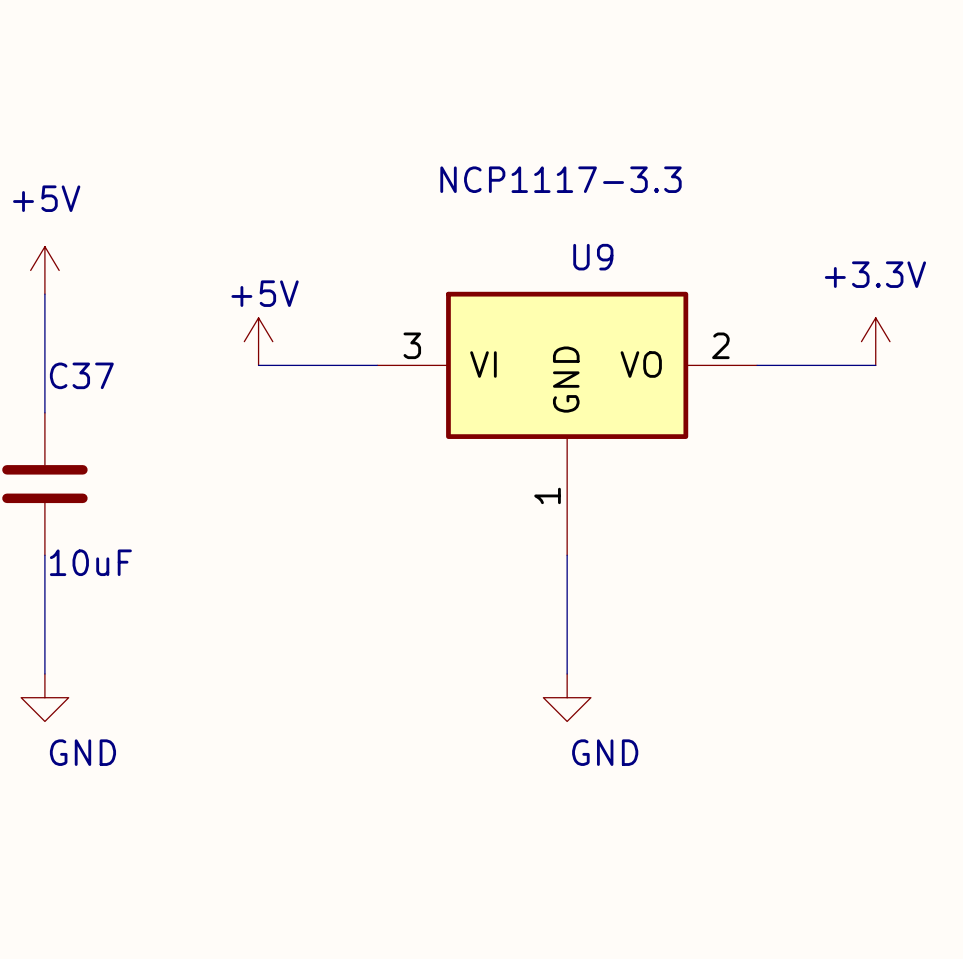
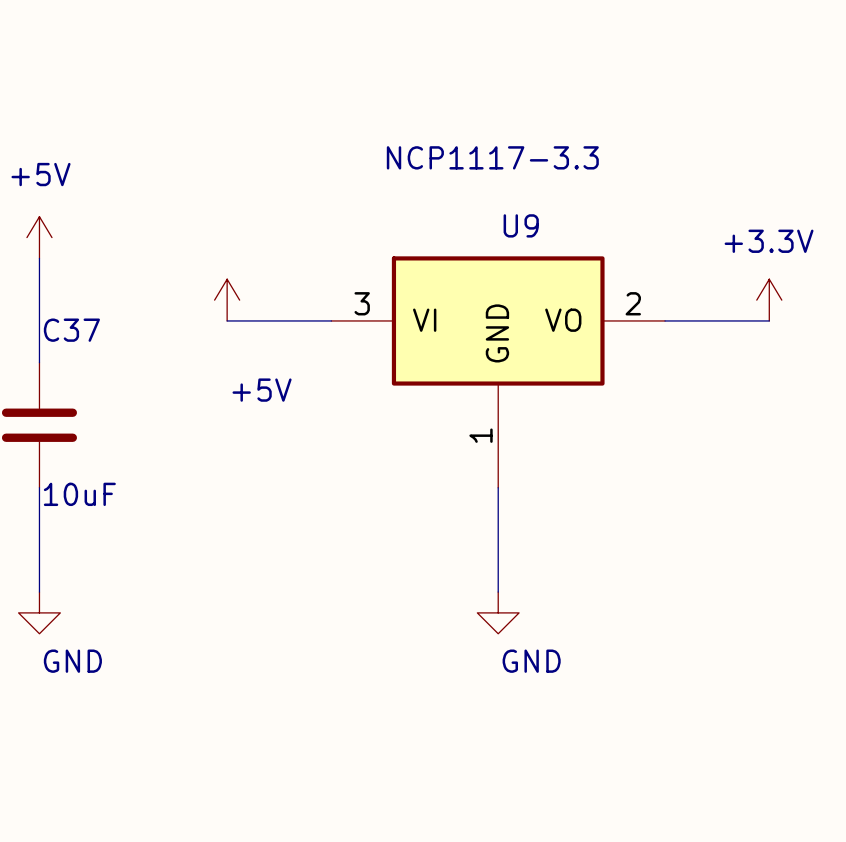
power symbol text position: +5V (265, 293) -> +5V (262, 390)

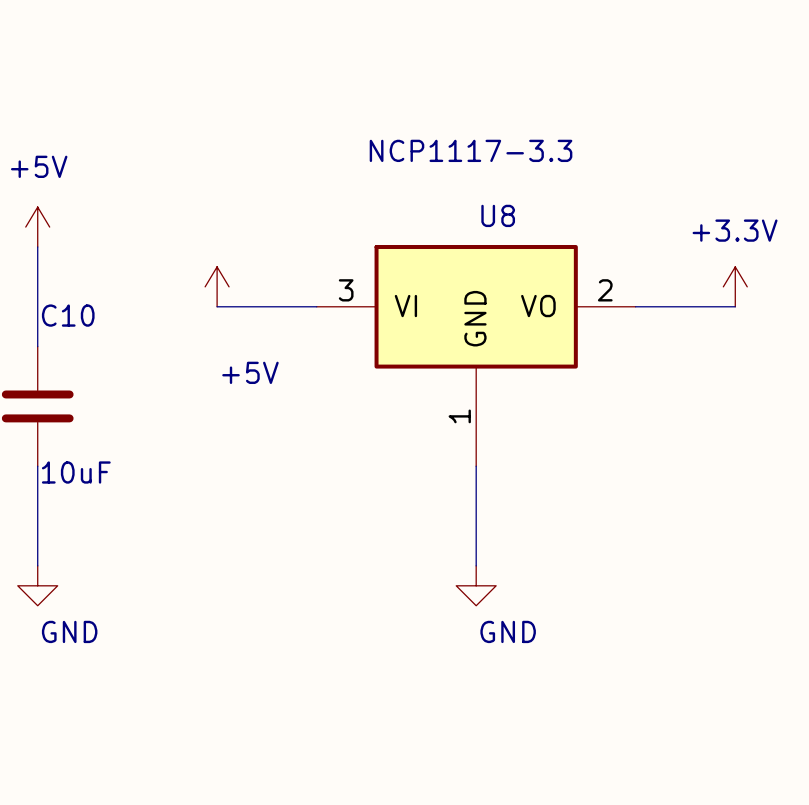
U9 name: U9 (521, 225) -> U8 (498, 215)
C37 name: C37 (71, 330) -> C10 (68, 315)

